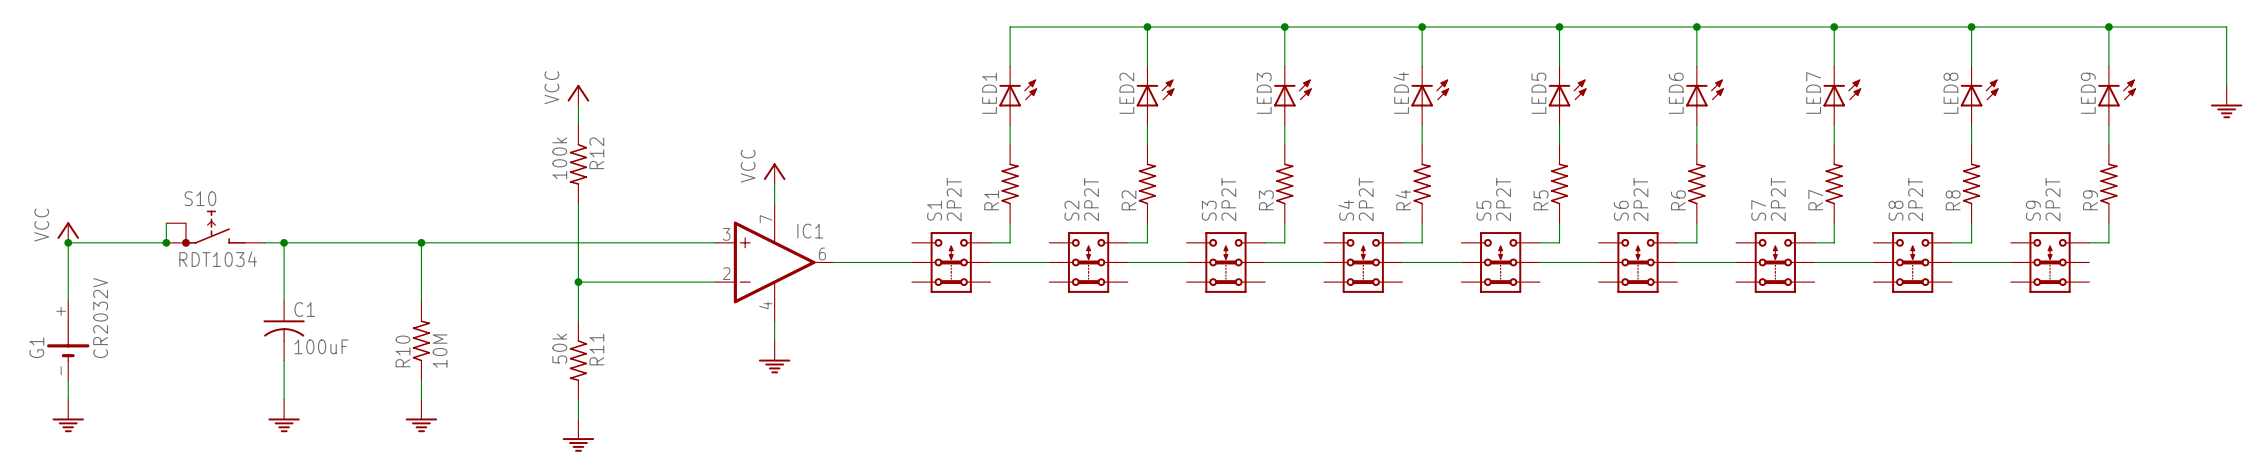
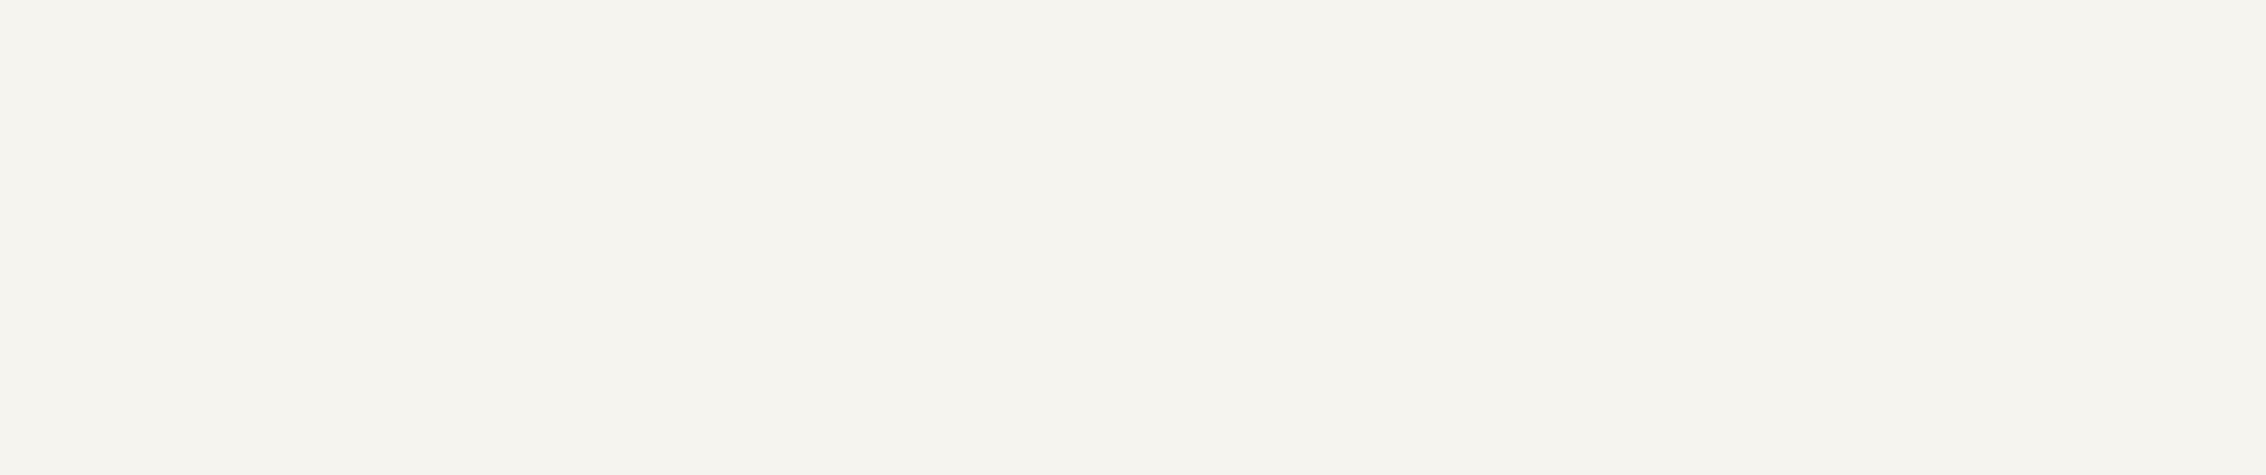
wire: (1147, 27) (1147, 66) -> none
junction: (1147, 27) -> none
wire: (1284, 27) (1284, 66) -> none
junction: (1284, 27) -> none
wire: (1422, 27) (1422, 66) -> none
junction: (1422, 27) -> none
wire: (1559, 27) (1559, 66) -> none
junction: (1559, 27) -> none
wire: (1696, 27) (1696, 66) -> none
junction: (1696, 27) -> none
wire: (1834, 27) (1834, 66) -> none
junction: (1834, 27) -> none
wire: (1971, 27) (1971, 66) -> none
junction: (1971, 27) -> none
wire: (2108, 27) (2108, 66) -> none
junction: (2108, 27) -> none
wire: (1010, 66) (1010, 27) (2226, 27) (2226, 85) -> none
power symbol: VCC (578, 95) -> none
LED1: (1018, 95) -> none
LED2: (1155, 95) -> none
LED3: (1292, 95) -> none
LED4: (1430, 95) -> none
LED5: (1567, 95) -> none
LED6: (1705, 95) -> none
LED7: (1842, 95) -> none
LED8: (1979, 95) -> none
LED9: (2117, 95) -> none
power symbol: (2226, 102) -> none
wire: (578, 105) (578, 125) -> none
wire: (1010, 125) (1010, 144) -> none
wire: (1147, 125) (1147, 144) -> none
wire: (1284, 125) (1284, 144) -> none
wire: (1422, 125) (1422, 144) -> none
wire: (1559, 125) (1559, 144) -> none
wire: (1696, 125) (1696, 144) -> none
wire: (1834, 125) (1834, 144) -> none
wire: (1971, 125) (1971, 144) -> none
wire: (2108, 125) (2108, 144) -> none
R12: 100k (578, 164) -> none
power symbol: VCC (774, 173) -> none
wire: (774, 183) (774, 203) -> none
R1: (1010, 183) -> none
R2: (1147, 183) -> none
R3: (1284, 183) -> none
R4: (1422, 183) -> none
R5: (1559, 183) -> none
R6: (1696, 183) -> none
R7: (1834, 183) -> none
R8: (1971, 183) -> none
R9: (2108, 183) -> none
wire: (578, 203) (578, 321) -> none
wire: (166, 223) (166, 242) (68, 242) (68, 301) -> none
wire: (1010, 223) (1010, 242) (990, 242) -> none
wire: (1147, 223) (1147, 242) (1127, 242) -> none
wire: (1284, 223) (1284, 242) (1265, 242) -> none
wire: (1422, 223) (1422, 242) (1402, 242) -> none
wire: (1559, 223) (1559, 242) (1539, 242) -> none
wire: (1696, 223) (1696, 242) (1677, 242) -> none
wire: (1834, 223) (1834, 242) (1814, 242) -> none
wire: (1971, 223) (1971, 242) (1951, 242) -> none
wire: (2108, 223) (2108, 242) (2089, 242) -> none
S10: RDT1034 (215, 228) -> none
power symbol: VCC (68, 232) -> none
junction: (68, 242) -> none
junction: (166, 242) -> none
wire: (264, 242) (715, 242) -> none
wire: (284, 242) (284, 301) -> none
junction: (284, 242) -> none
wire: (421, 242) (421, 301) -> none
junction: (421, 242) -> none
IC1: (774, 262) -> none
wire: (833, 262) (911, 262) -> none
S1: 2P2T (951, 262) -> none
wire: (990, 262) (1049, 262) -> none
S2: 2P2T (1088, 262) -> none
wire: (1127, 262) (1186, 262) -> none
S3: 2P2T (1225, 262) -> none
wire: (1265, 262) (1324, 262) -> none
S4: 2P2T (1363, 262) -> none
wire: (1402, 262) (1461, 262) -> none
S5: 2P2T (1500, 262) -> none
wire: (1539, 262) (1598, 262) -> none
S6: 2P2T (1637, 262) -> none
wire: (1677, 262) (1736, 262) -> none
S7: 2P2T (1775, 262) -> none
wire: (1814, 262) (1873, 262) -> none
S8: 2P2T (1912, 262) -> none
wire: (1951, 262) (2010, 262) -> none
S9: 2P2T (2050, 262) -> none
wire: (578, 282) (715, 282) -> none
junction: (578, 282) -> none
wire: (774, 321) (774, 340) -> none
C1: 100uF (284, 331) -> none
G1: CR2032V (68, 340) -> none
R10: 10M (421, 340) -> none
power symbol: (774, 357) -> none
wire: (284, 360) (284, 399) -> none
R11: 50k (578, 360) -> none
wire: (68, 380) (68, 399) -> none
wire: (421, 380) (421, 399) -> none
wire: (578, 399) (578, 419) -> none
power symbol: (68, 416) -> none
power symbol: (284, 416) -> none
power symbol: (421, 416) -> none
power symbol: (578, 435) -> none

